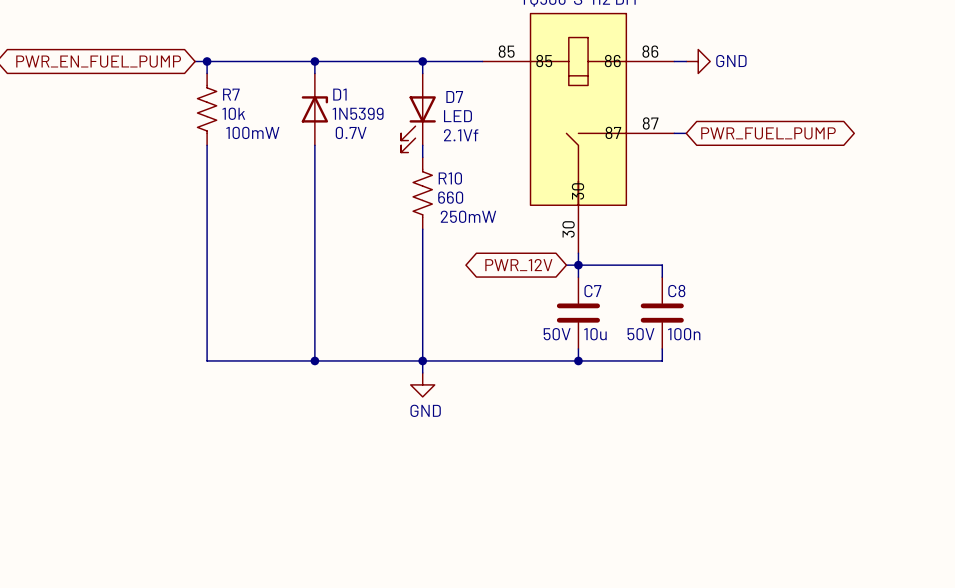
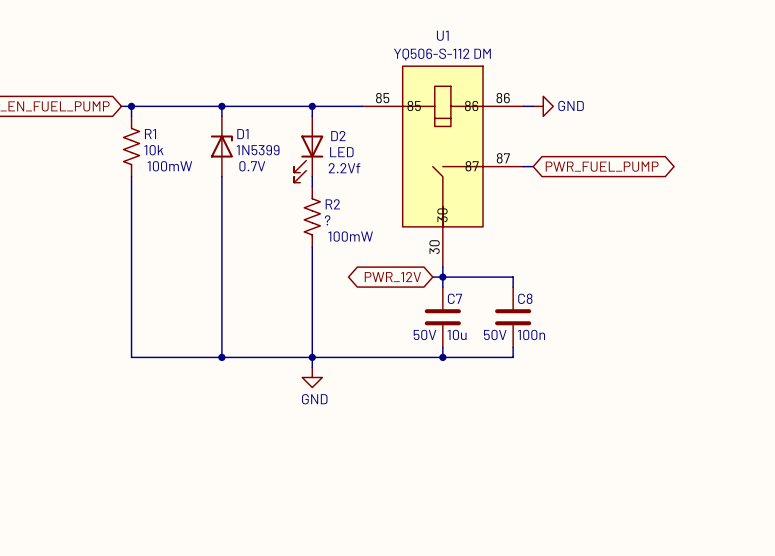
R7 name: R7 (231, 94) -> R1 (150, 134)
D7 name: D7 (454, 96) -> D2 (338, 136)
D7 text: 2.1Vf (461, 135) -> 2.2Vf (344, 168)
R10 name: R10 (450, 178) -> R2 (332, 204)
R10 value: 660 (450, 197) -> ? (327, 220)
R10 text: 250mW (468, 216) -> 100mW (350, 236)

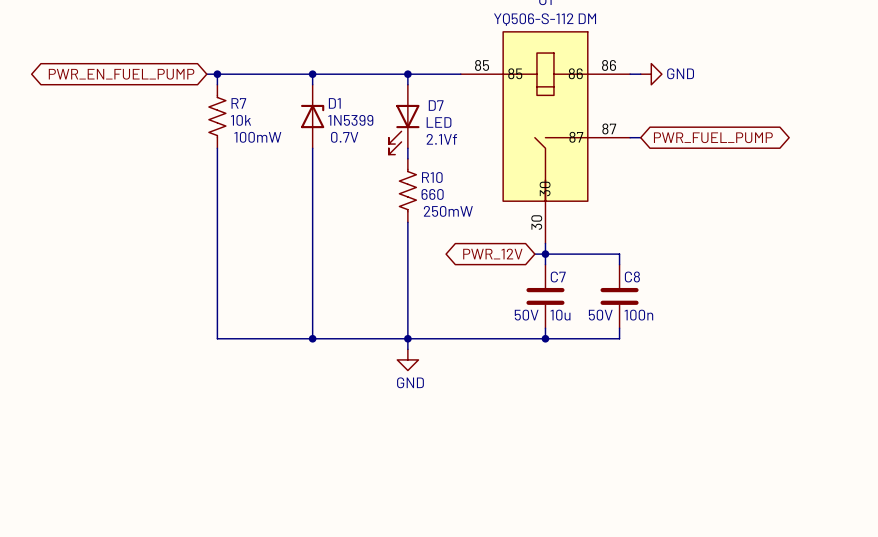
R1 name: R1 (150, 134) -> R7 (238, 103)
D2 name: D2 (338, 136) -> D7 (436, 105)
D2 text: 2.2Vf (344, 168) -> 2.1Vf (441, 139)
R2 name: R2 (332, 204) -> R10 (432, 177)
R2 value: ? (327, 220) -> 660 (432, 194)
R2 text: 100mW (350, 236) -> 250mW (448, 211)

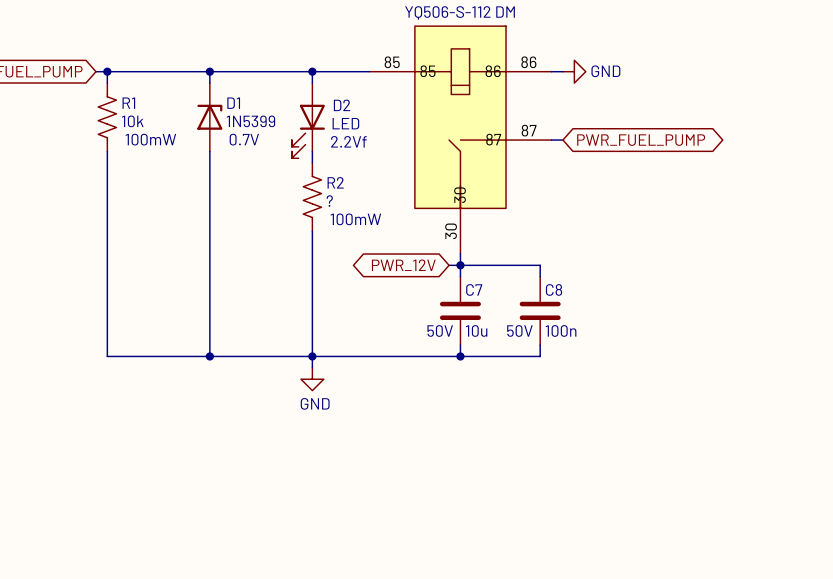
R7 name: R7 (238, 103) -> R1 (128, 103)
D7 name: D7 (436, 105) -> D2 (342, 105)
D7 text: 2.1Vf (441, 139) -> 2.2Vf (348, 141)
R10 name: R10 (432, 177) -> R2 (335, 182)
R10 value: 660 (432, 194) -> ? (329, 201)
R10 text: 250mW (448, 211) -> 100mW (355, 219)

